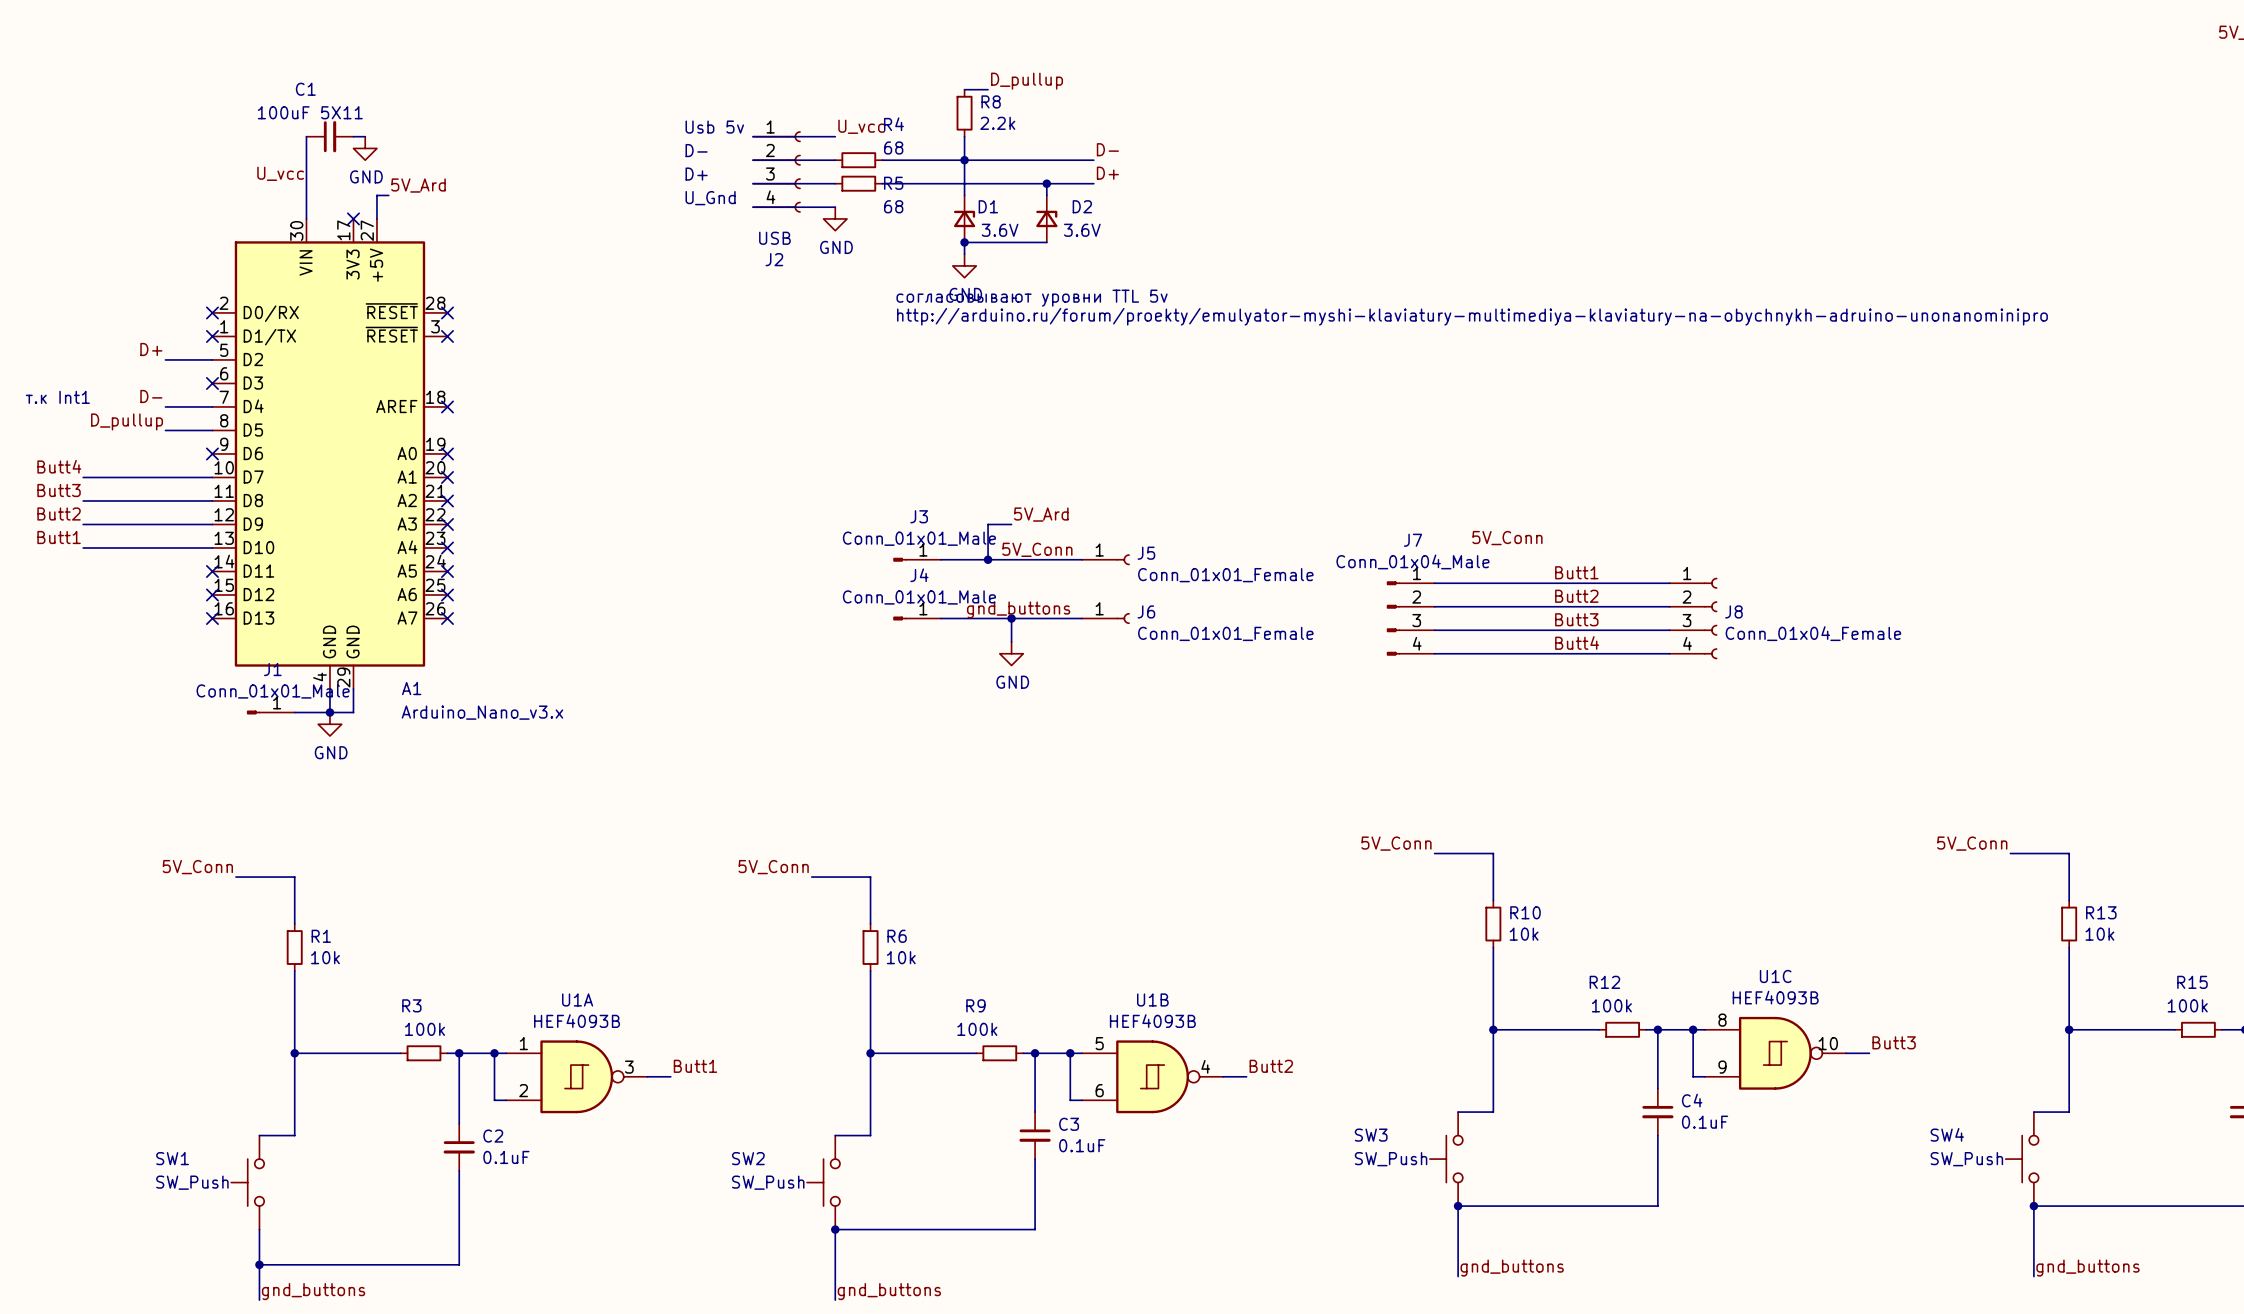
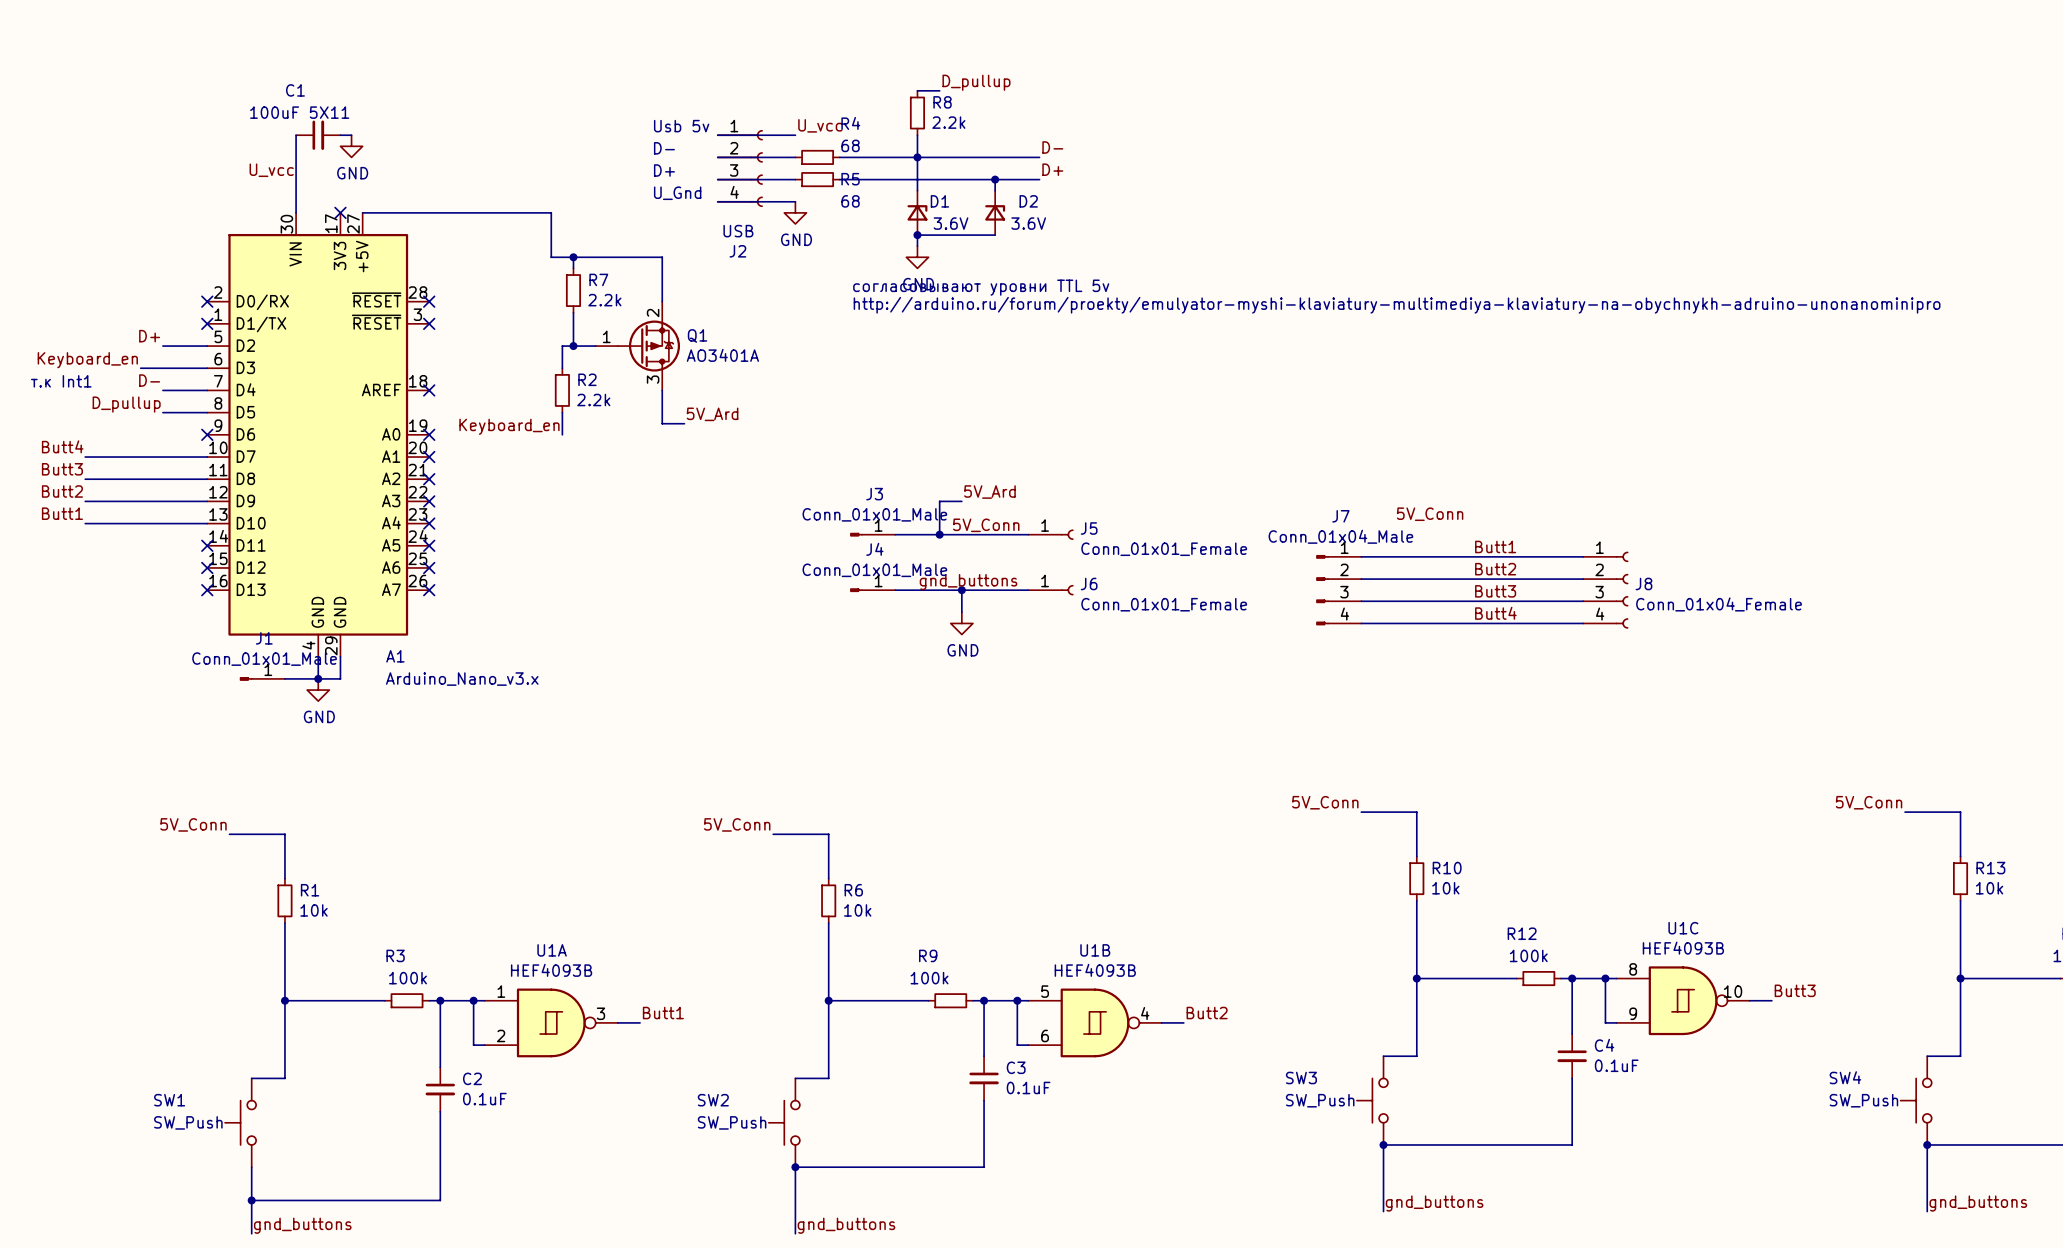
label: 5V_Ard (418, 185) -> none
wire: (388, 195) (376, 195) (376, 218) -> (662, 301) (662, 257) (551, 257) (551, 212) (362, 212)
wire: none -> (573, 257) (573, 268)
junction: none -> (573, 257)
R7: none -> 2.2k (573, 290)
wire: none -> (573, 312) (573, 346)
junction: none -> (573, 346)
wire: none -> (595, 346) (562, 346) (562, 368)
Q1: none -> AO3401A (637, 346)
label: none -> Keyboard_en (87, 360)
wire: none -> (140, 368) (207, 368)
no-connect mark: (212, 383) -> none
R2: none -> 2.2k (562, 390)
wire: none -> (662, 390) (662, 423) (684, 423)
wire: none -> (562, 412) (562, 434)
label: none -> 5V_Ard (712, 414)
label: none -> Keyboard_en (509, 426)

